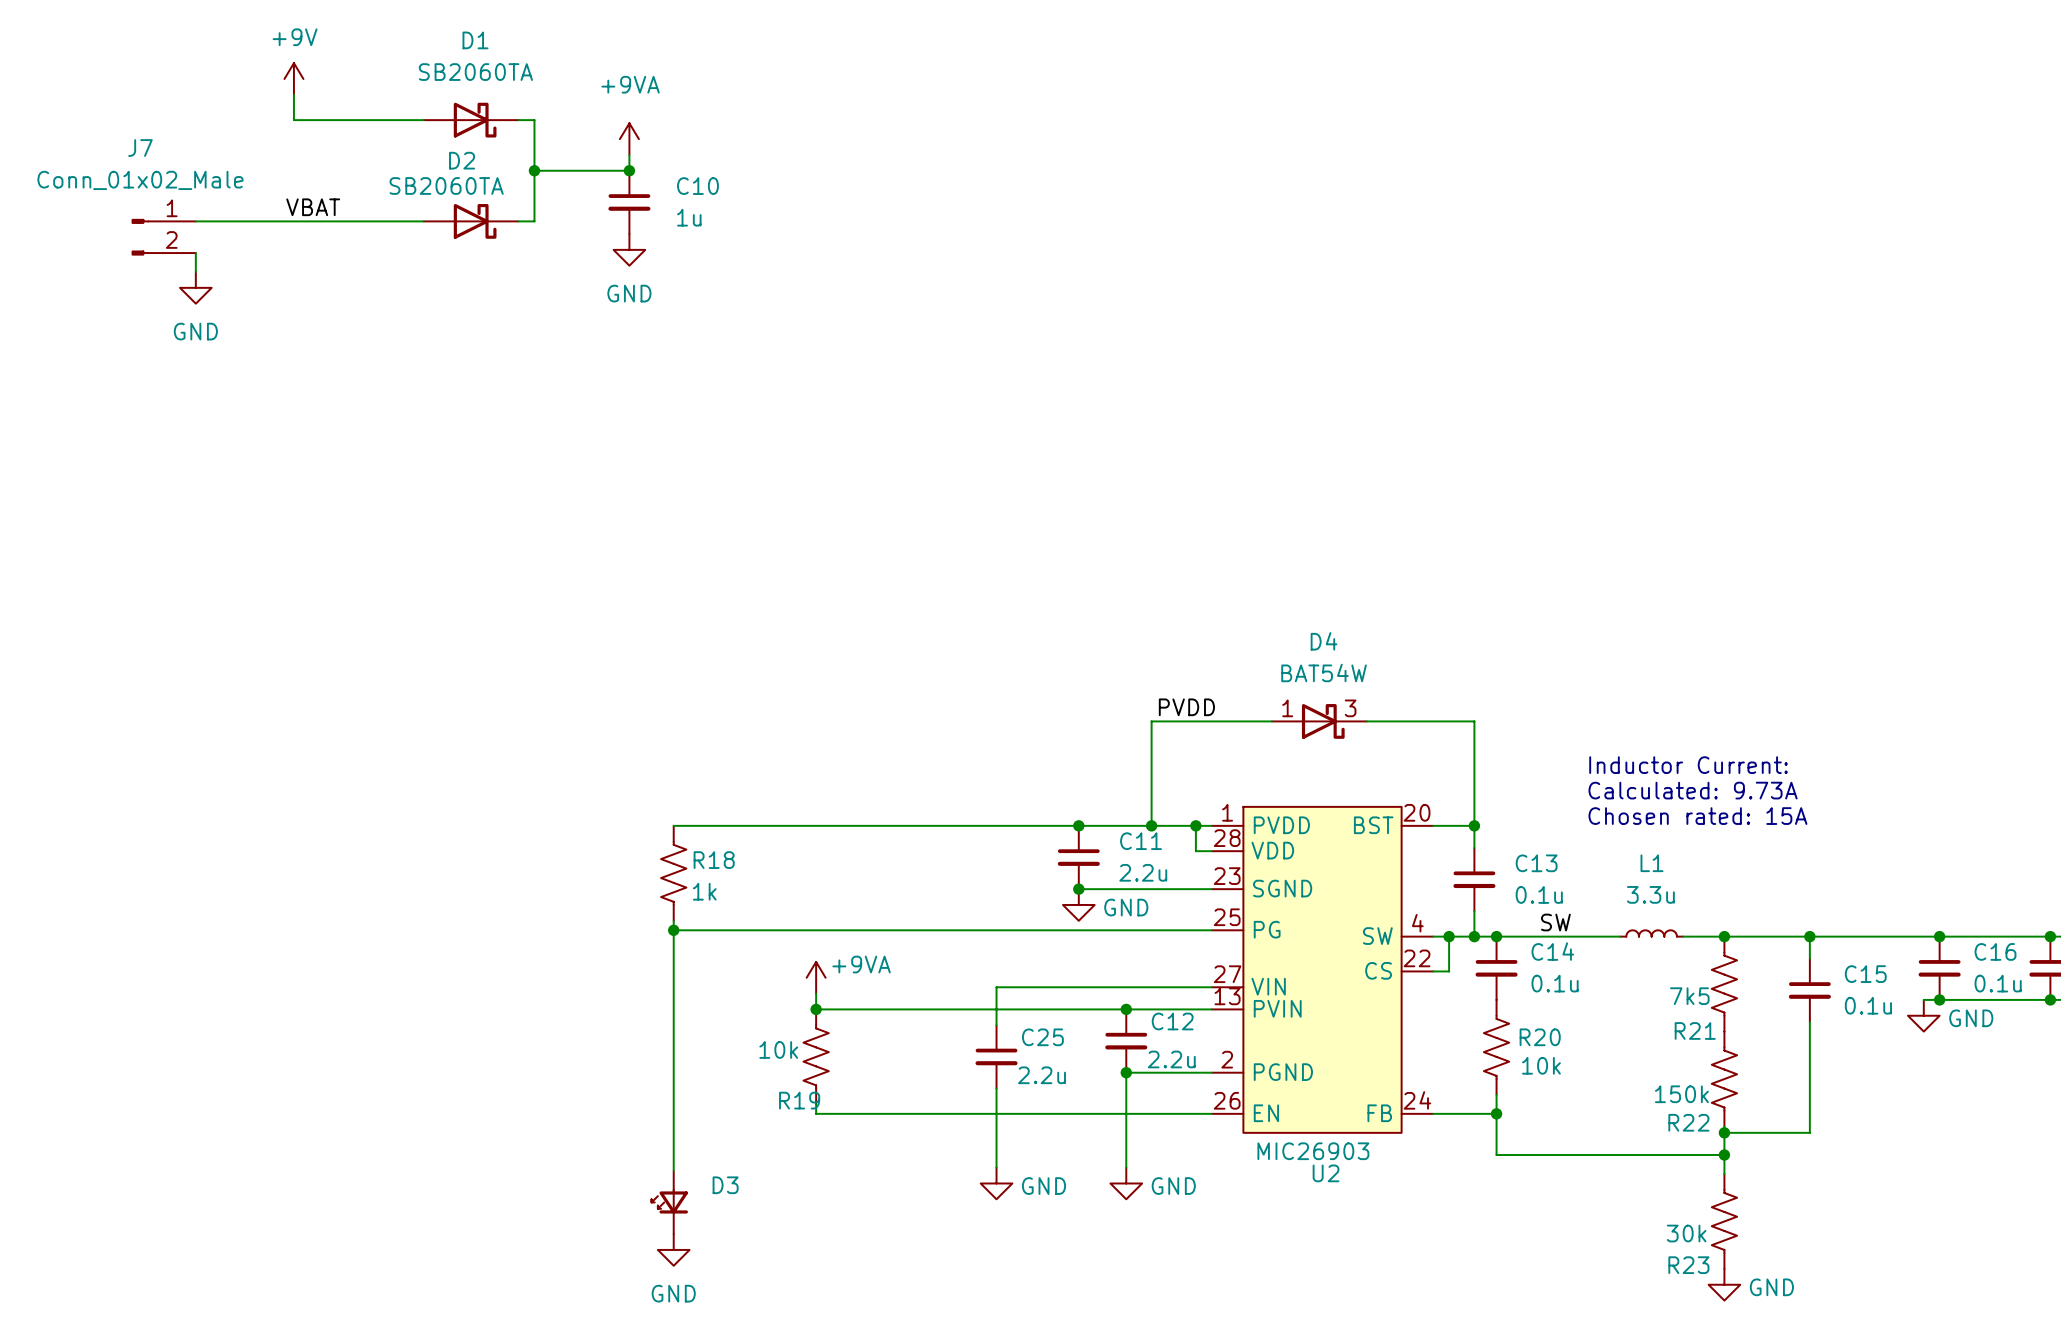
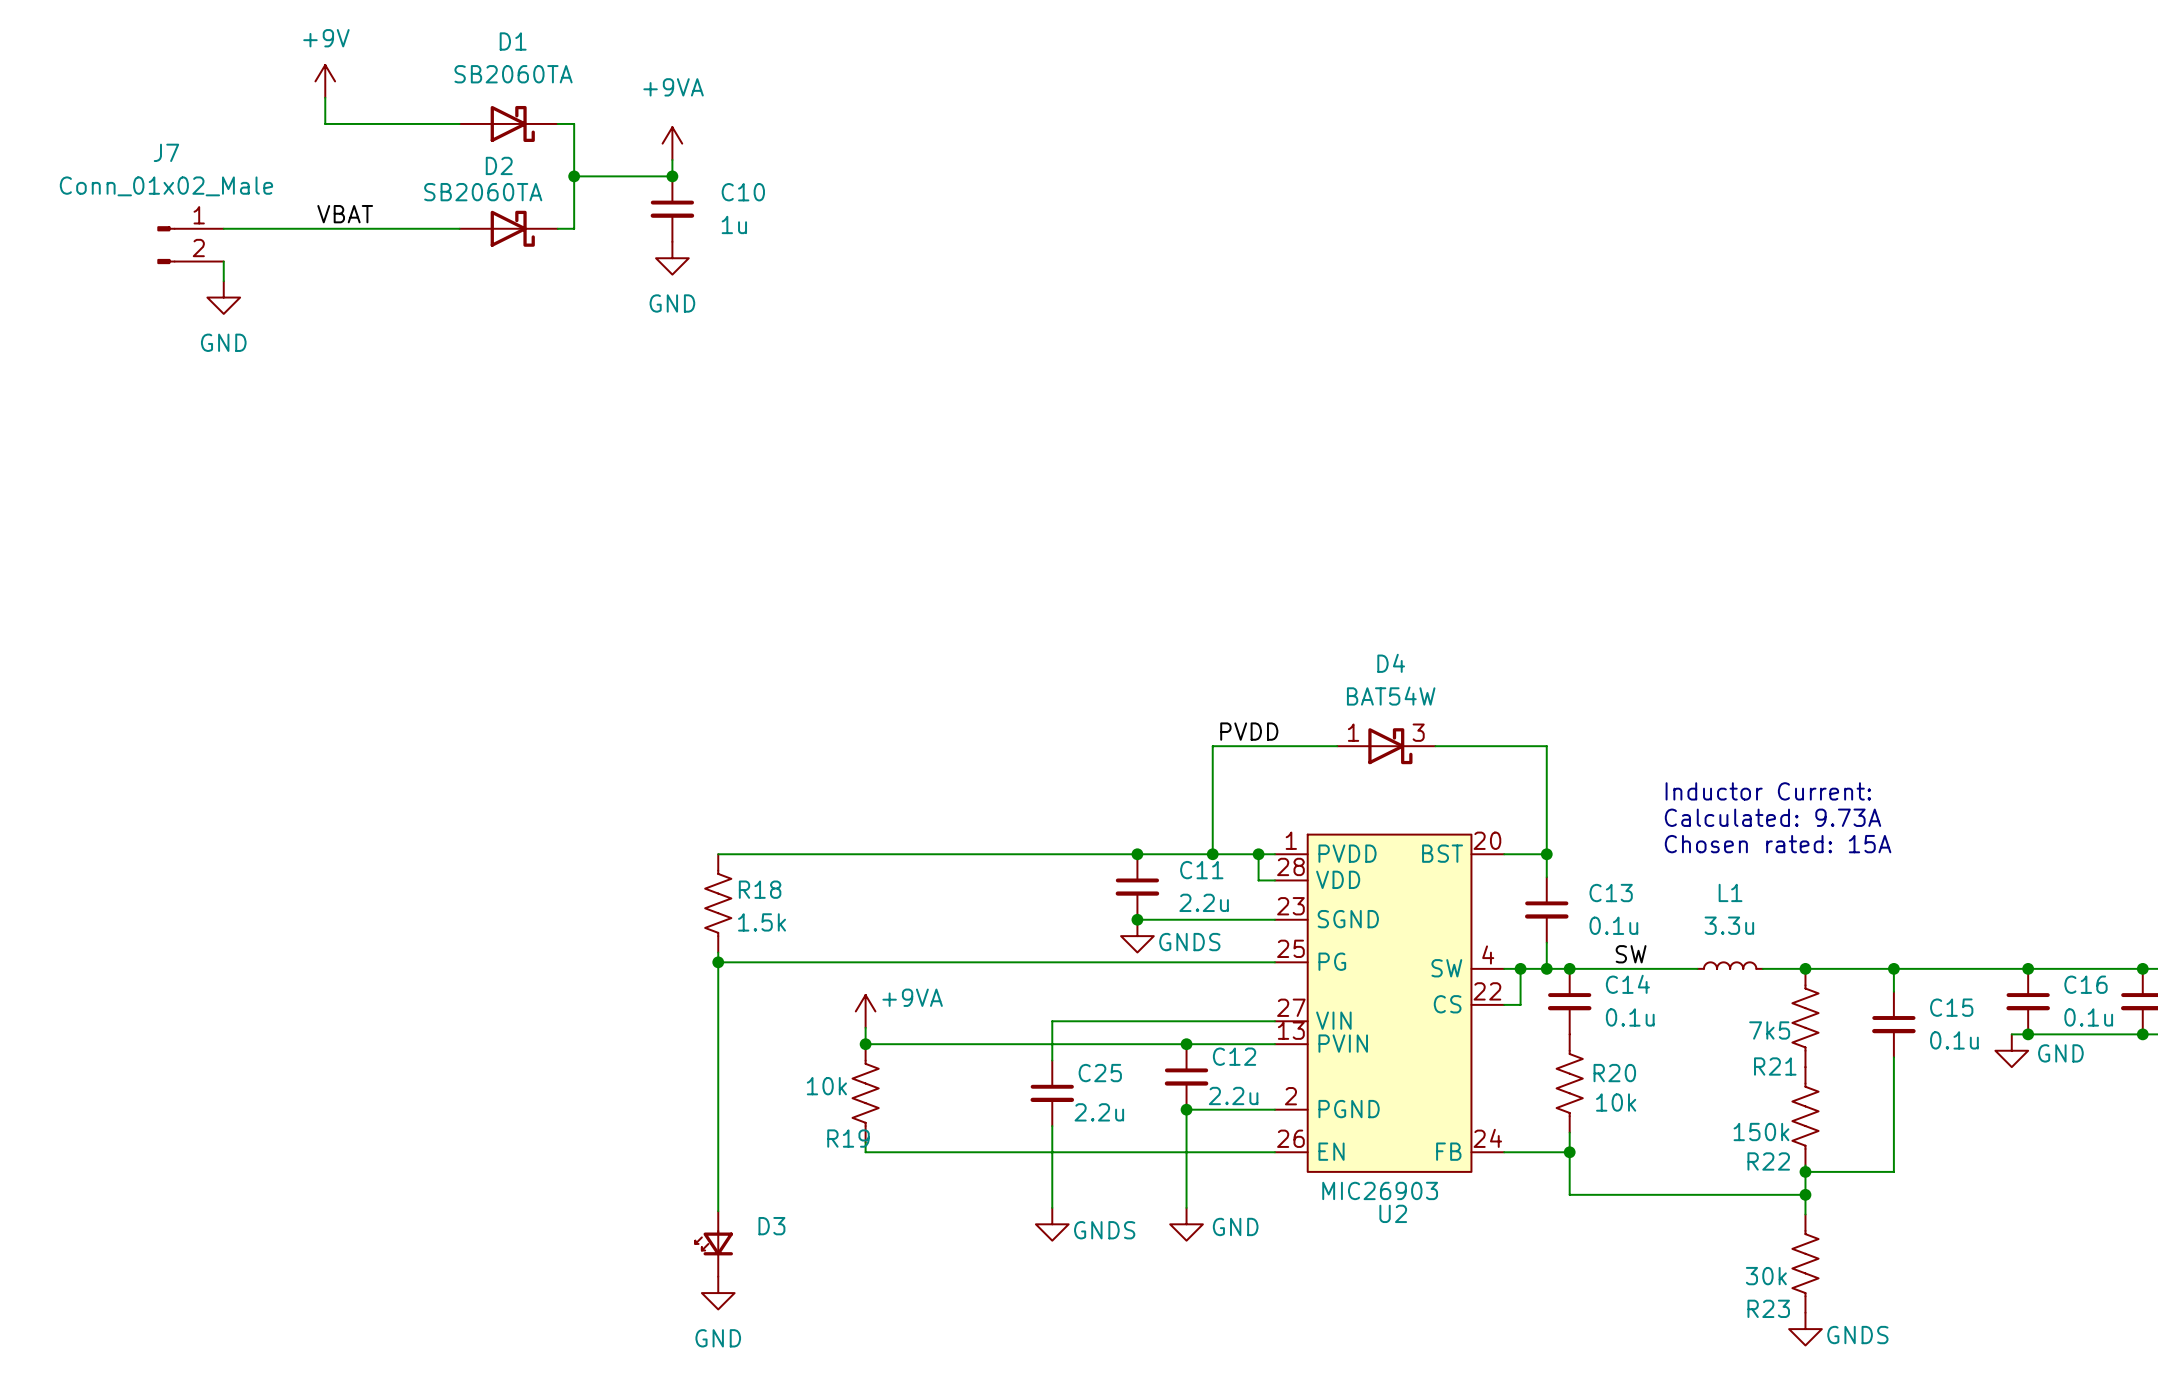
R18 value: 1k (704, 891) -> 1.5k (762, 922)
power symbol: GND (1078, 904) -> GNDS (1137, 936)
power symbol: GND (996, 1183) -> GNDS (1052, 1224)
power symbol: GND (1724, 1284) -> GNDS (1805, 1329)

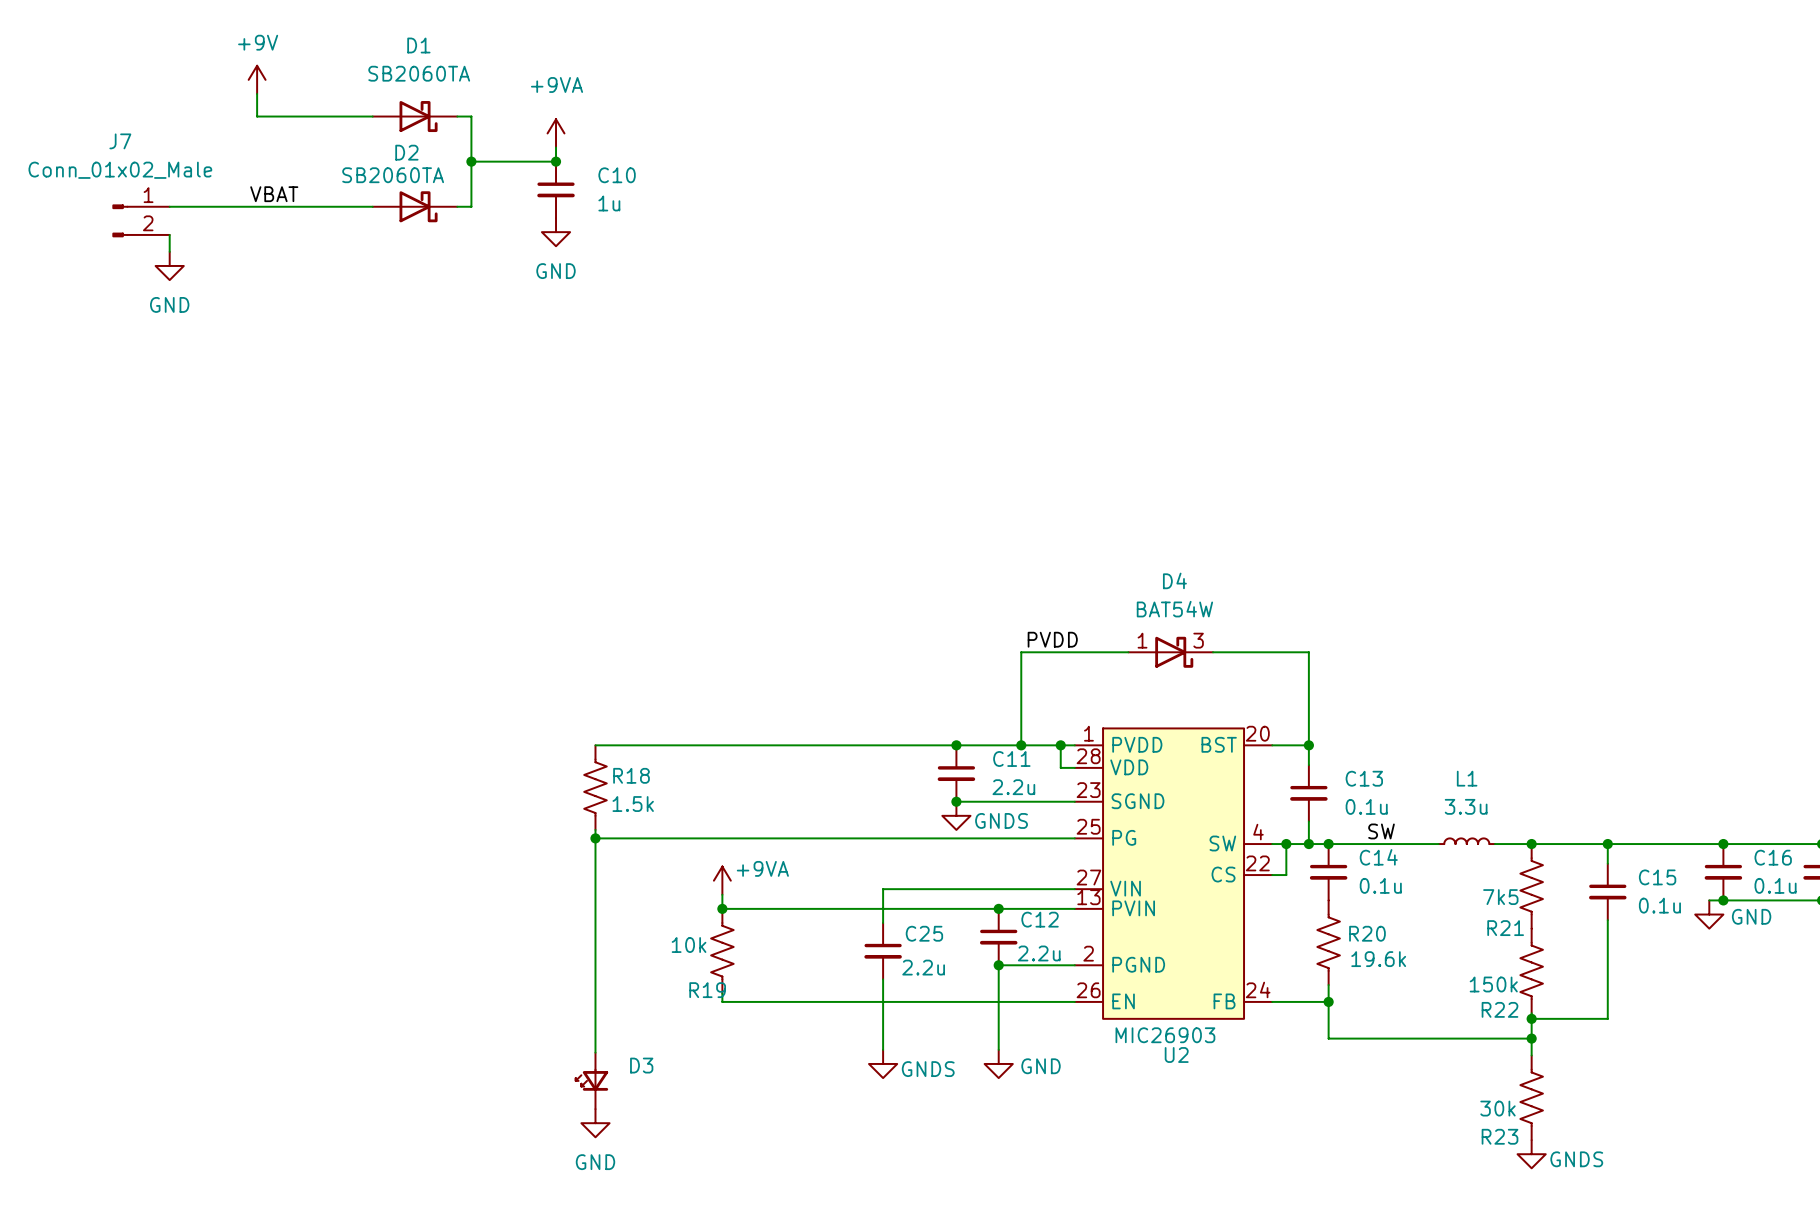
text: Inductor Current: (1768, 791) -> none
text: Calculated: 9.73A (1773, 817) -> none
text: Chosen rated: 15A (1778, 844) -> none
R20 value: 10k (1616, 1102) -> 19.6k (1378, 959)

